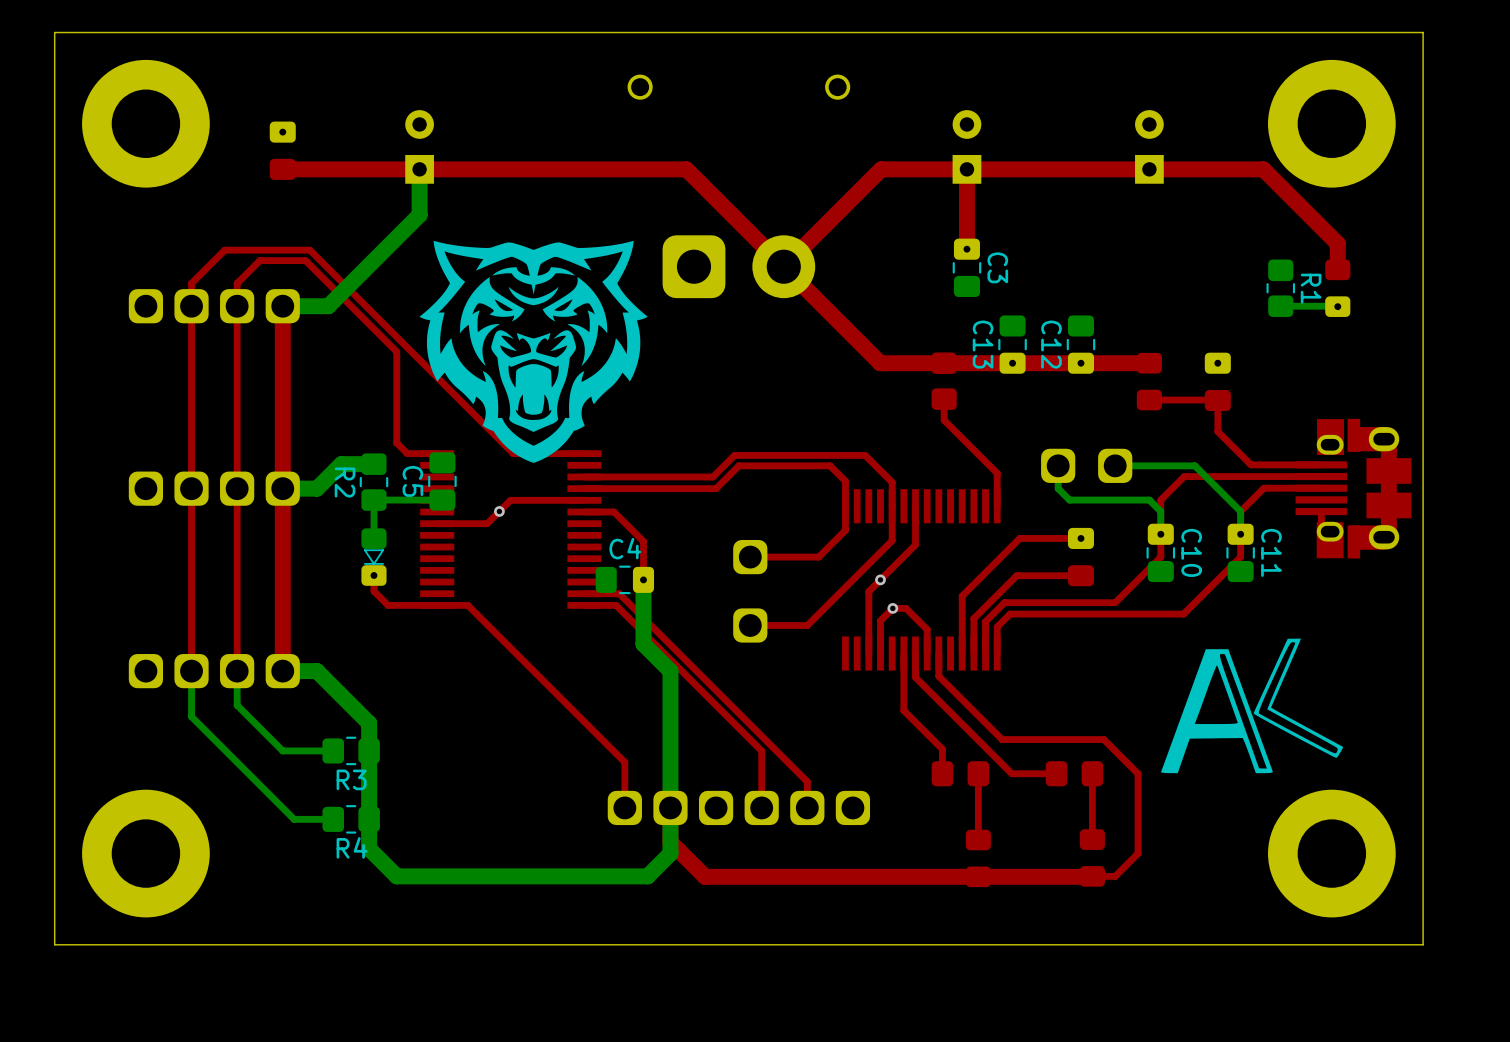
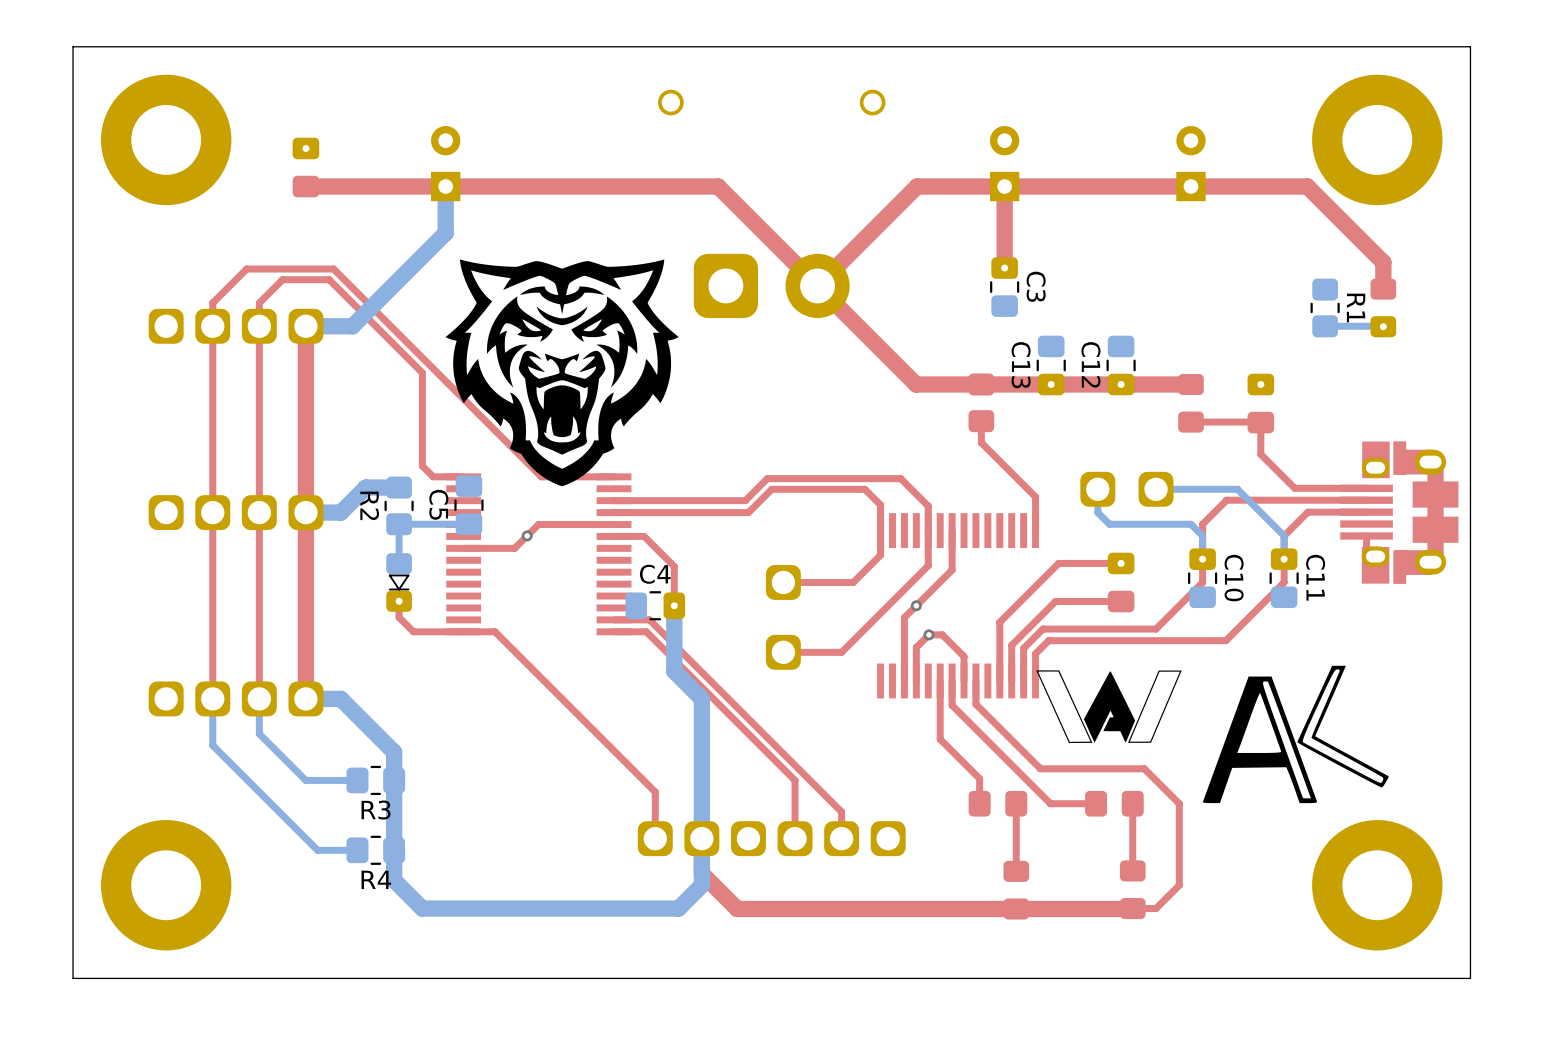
drawing: none -> [1036, 670, 1182, 744]

